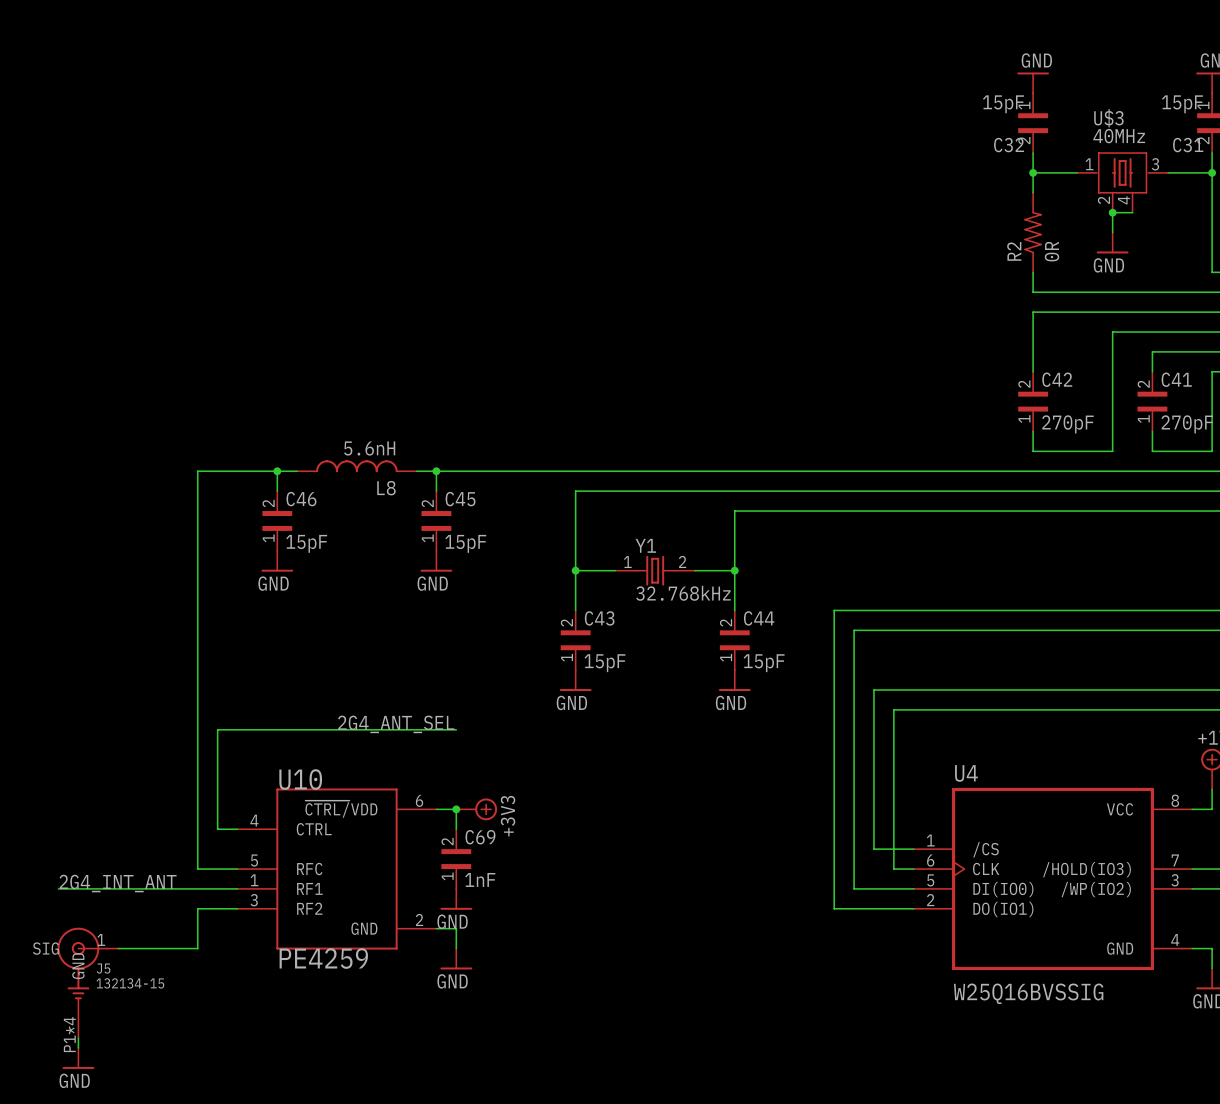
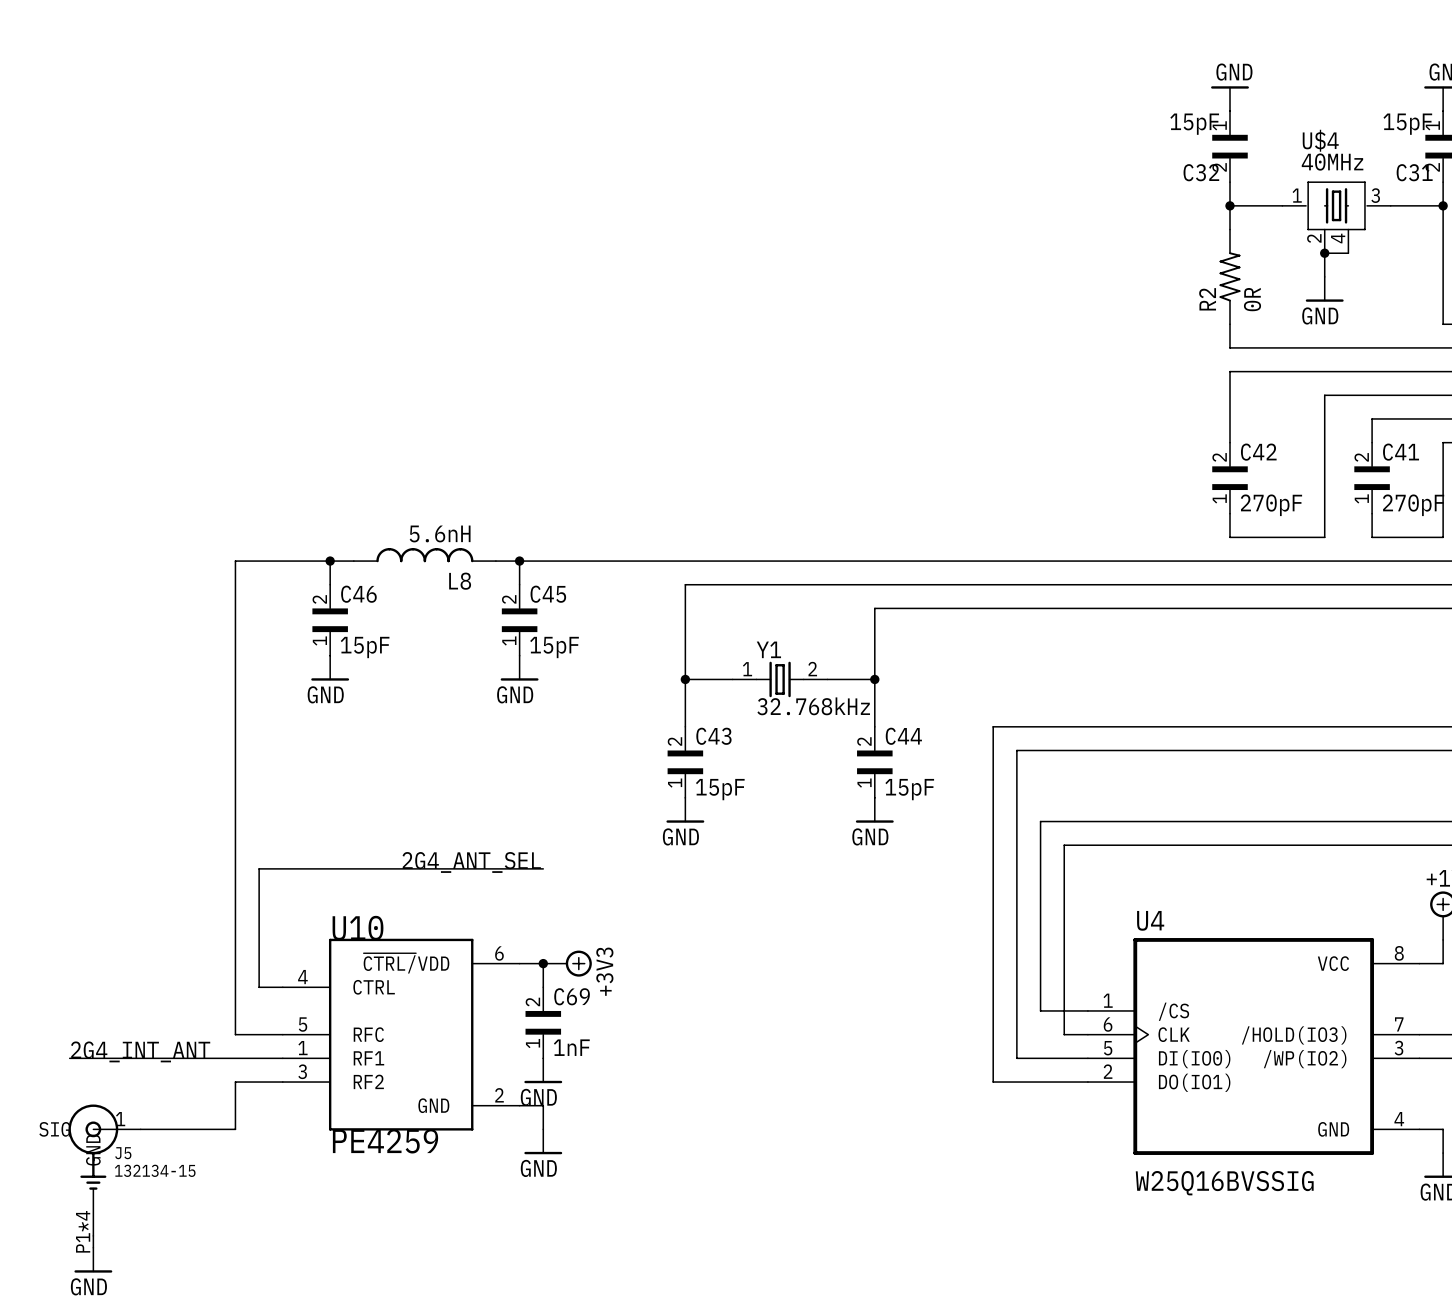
U$3 name: U$3 (1108, 118) -> U$4 (1320, 140)

